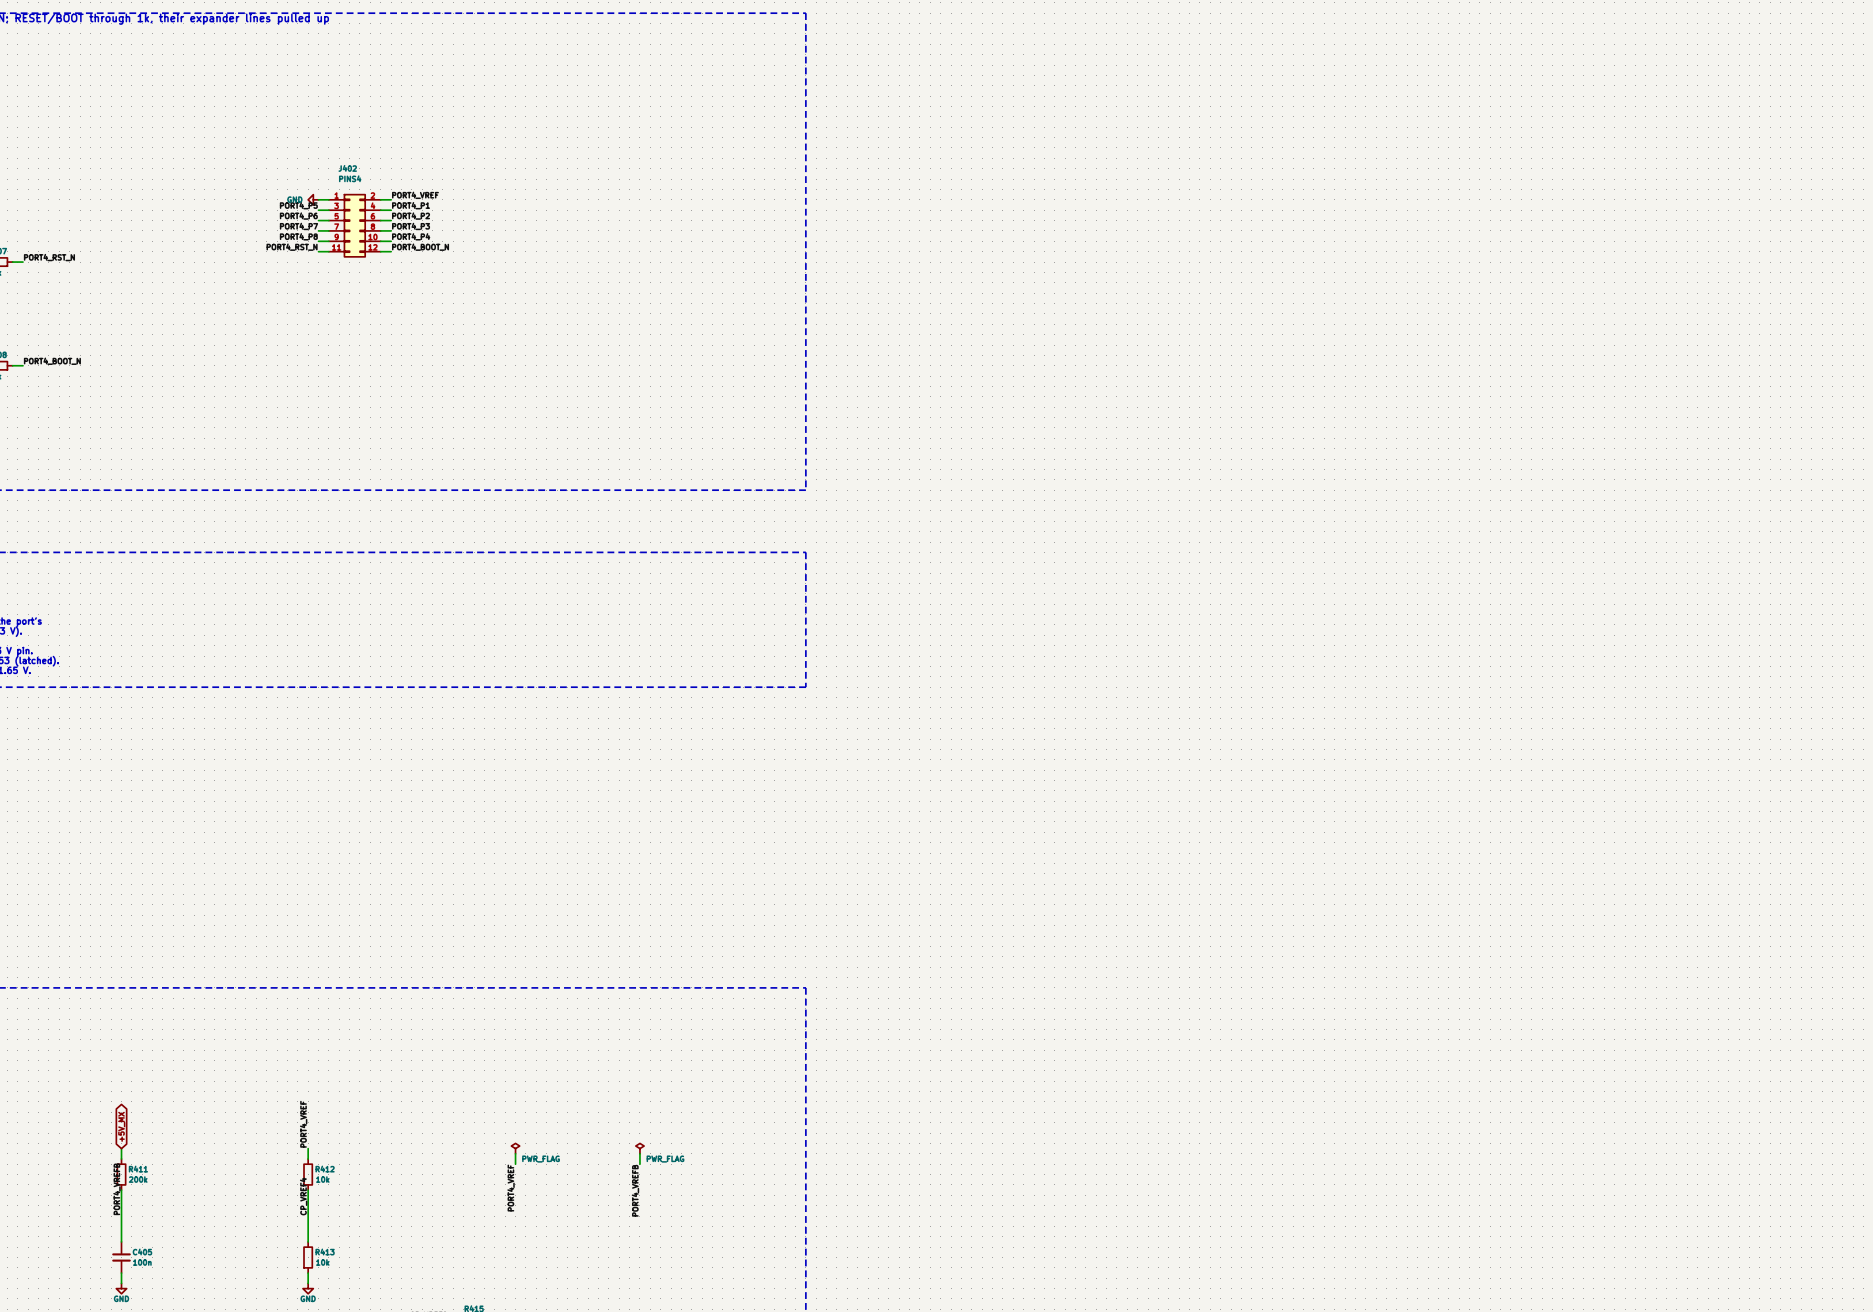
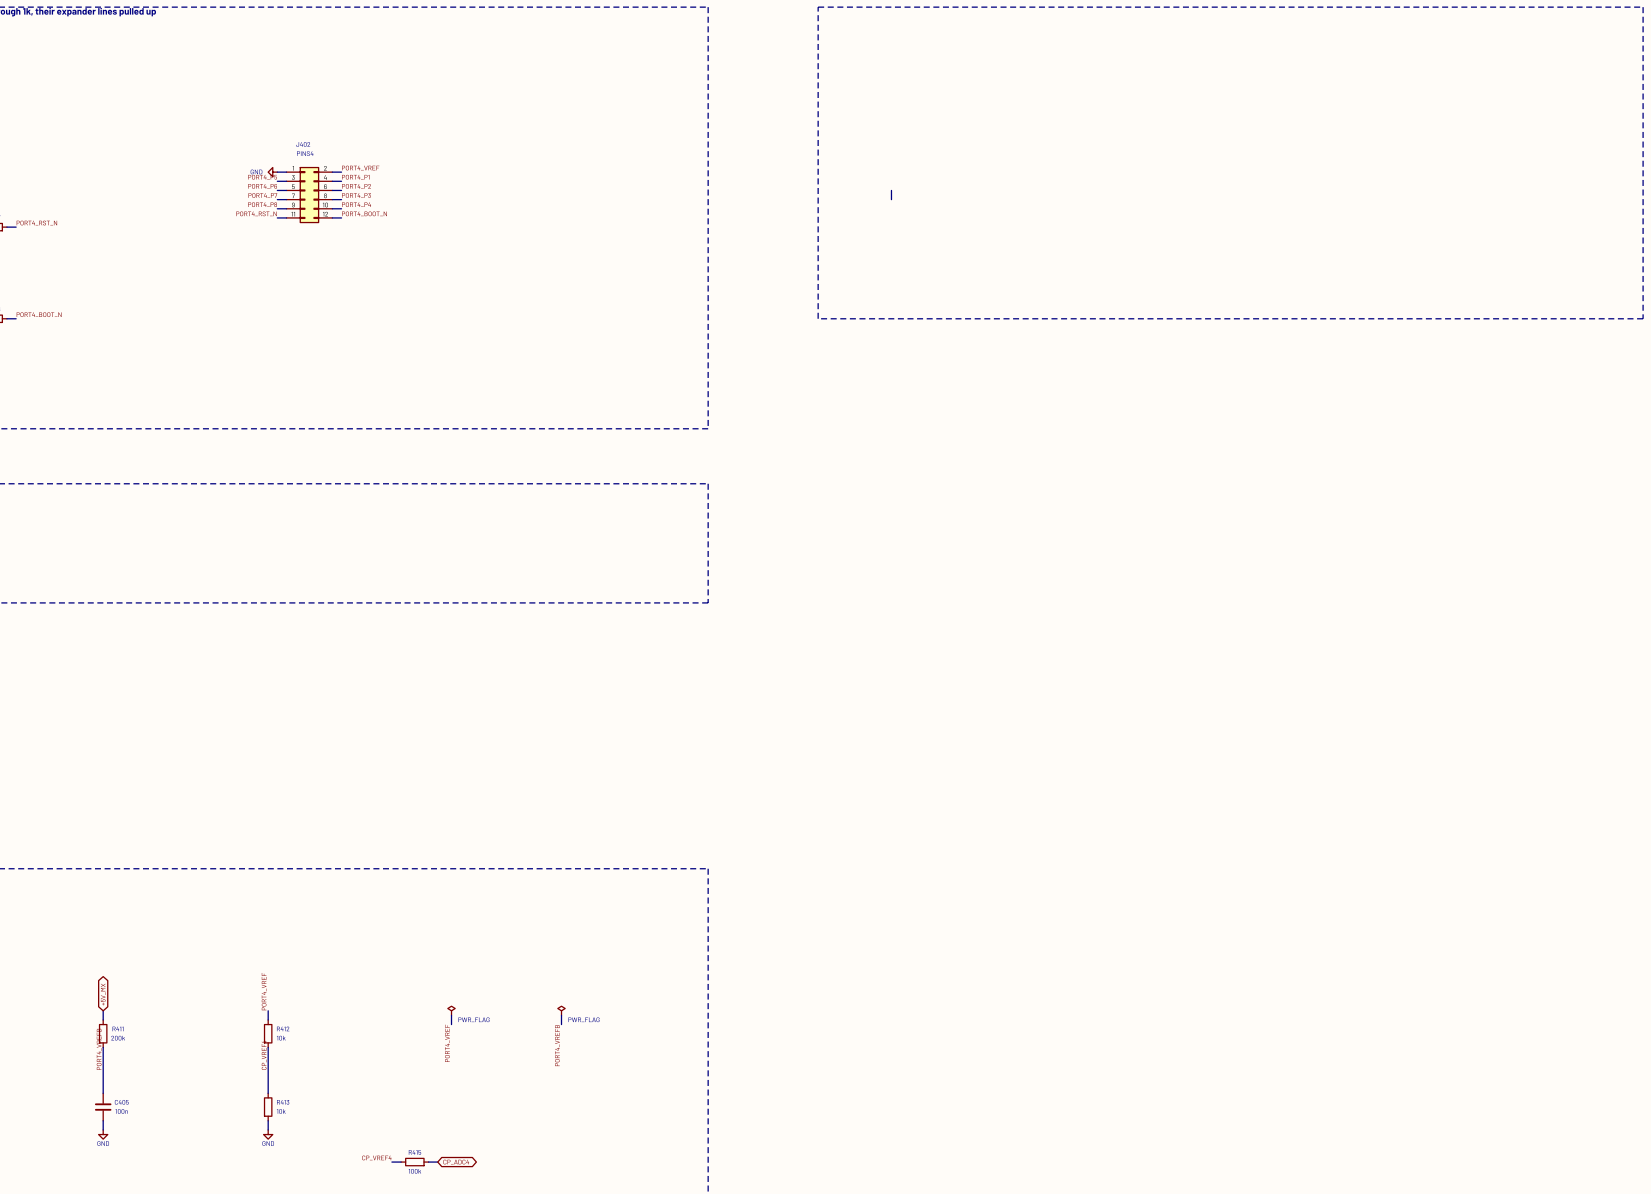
line: none -> (818, 7) (1643, 7) (1643, 318) (818, 318) (818, 7)
wire: none -> (891, 190) (891, 199)

